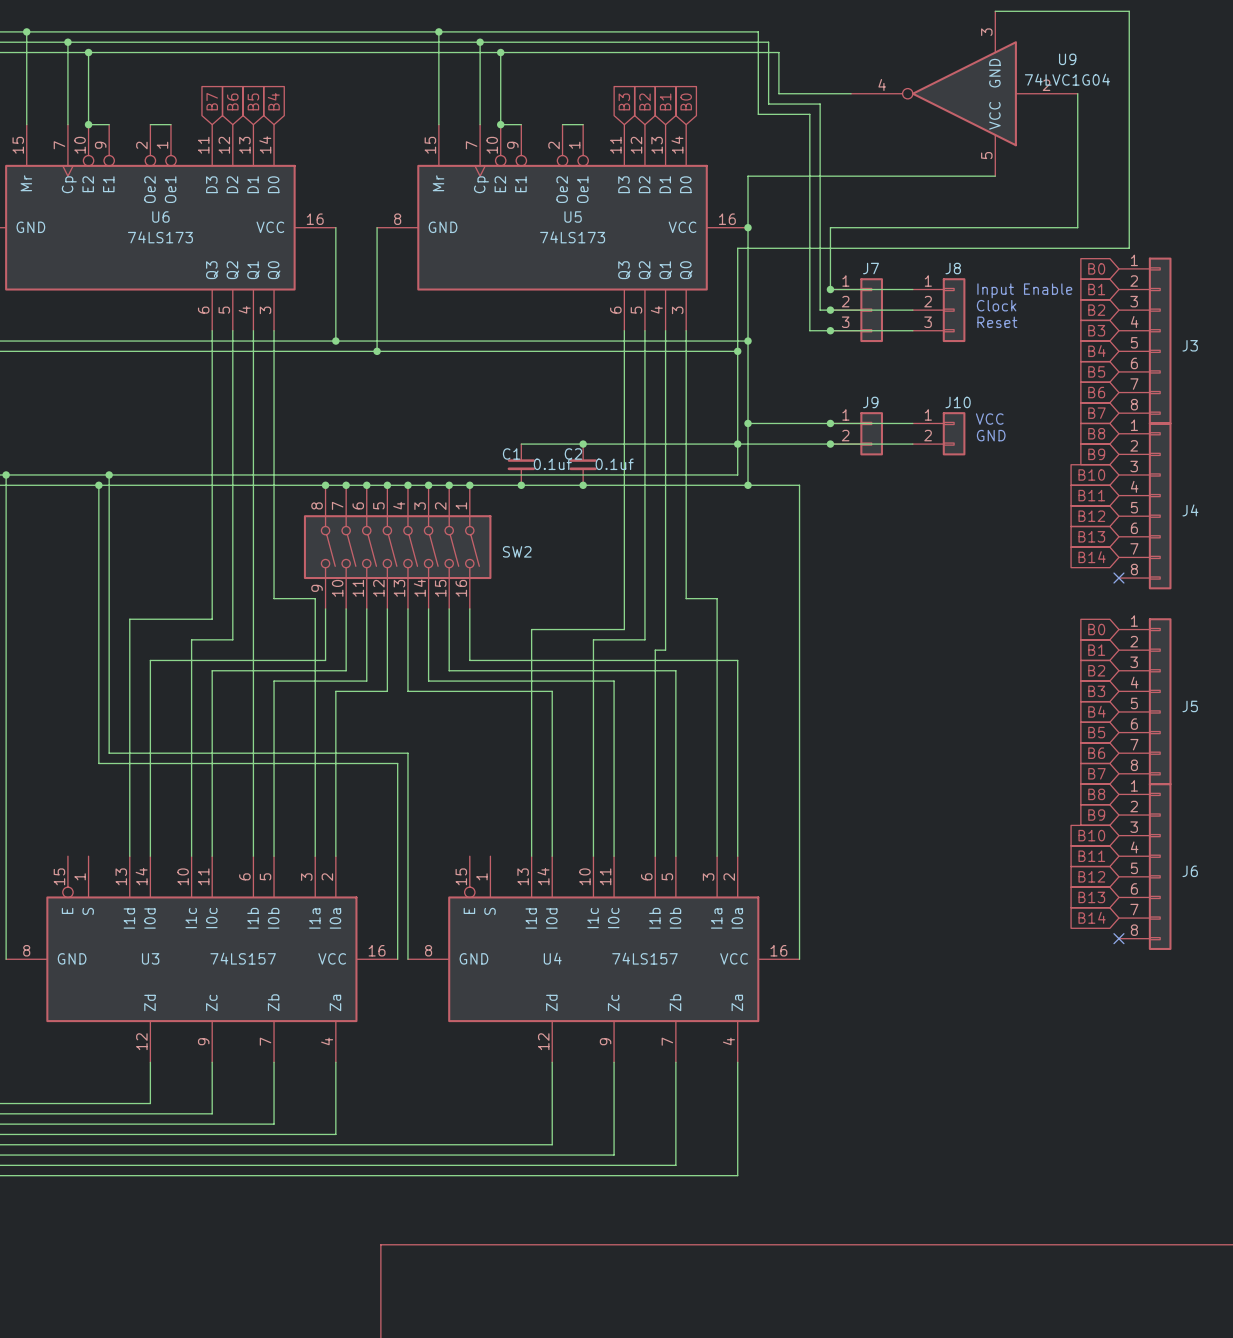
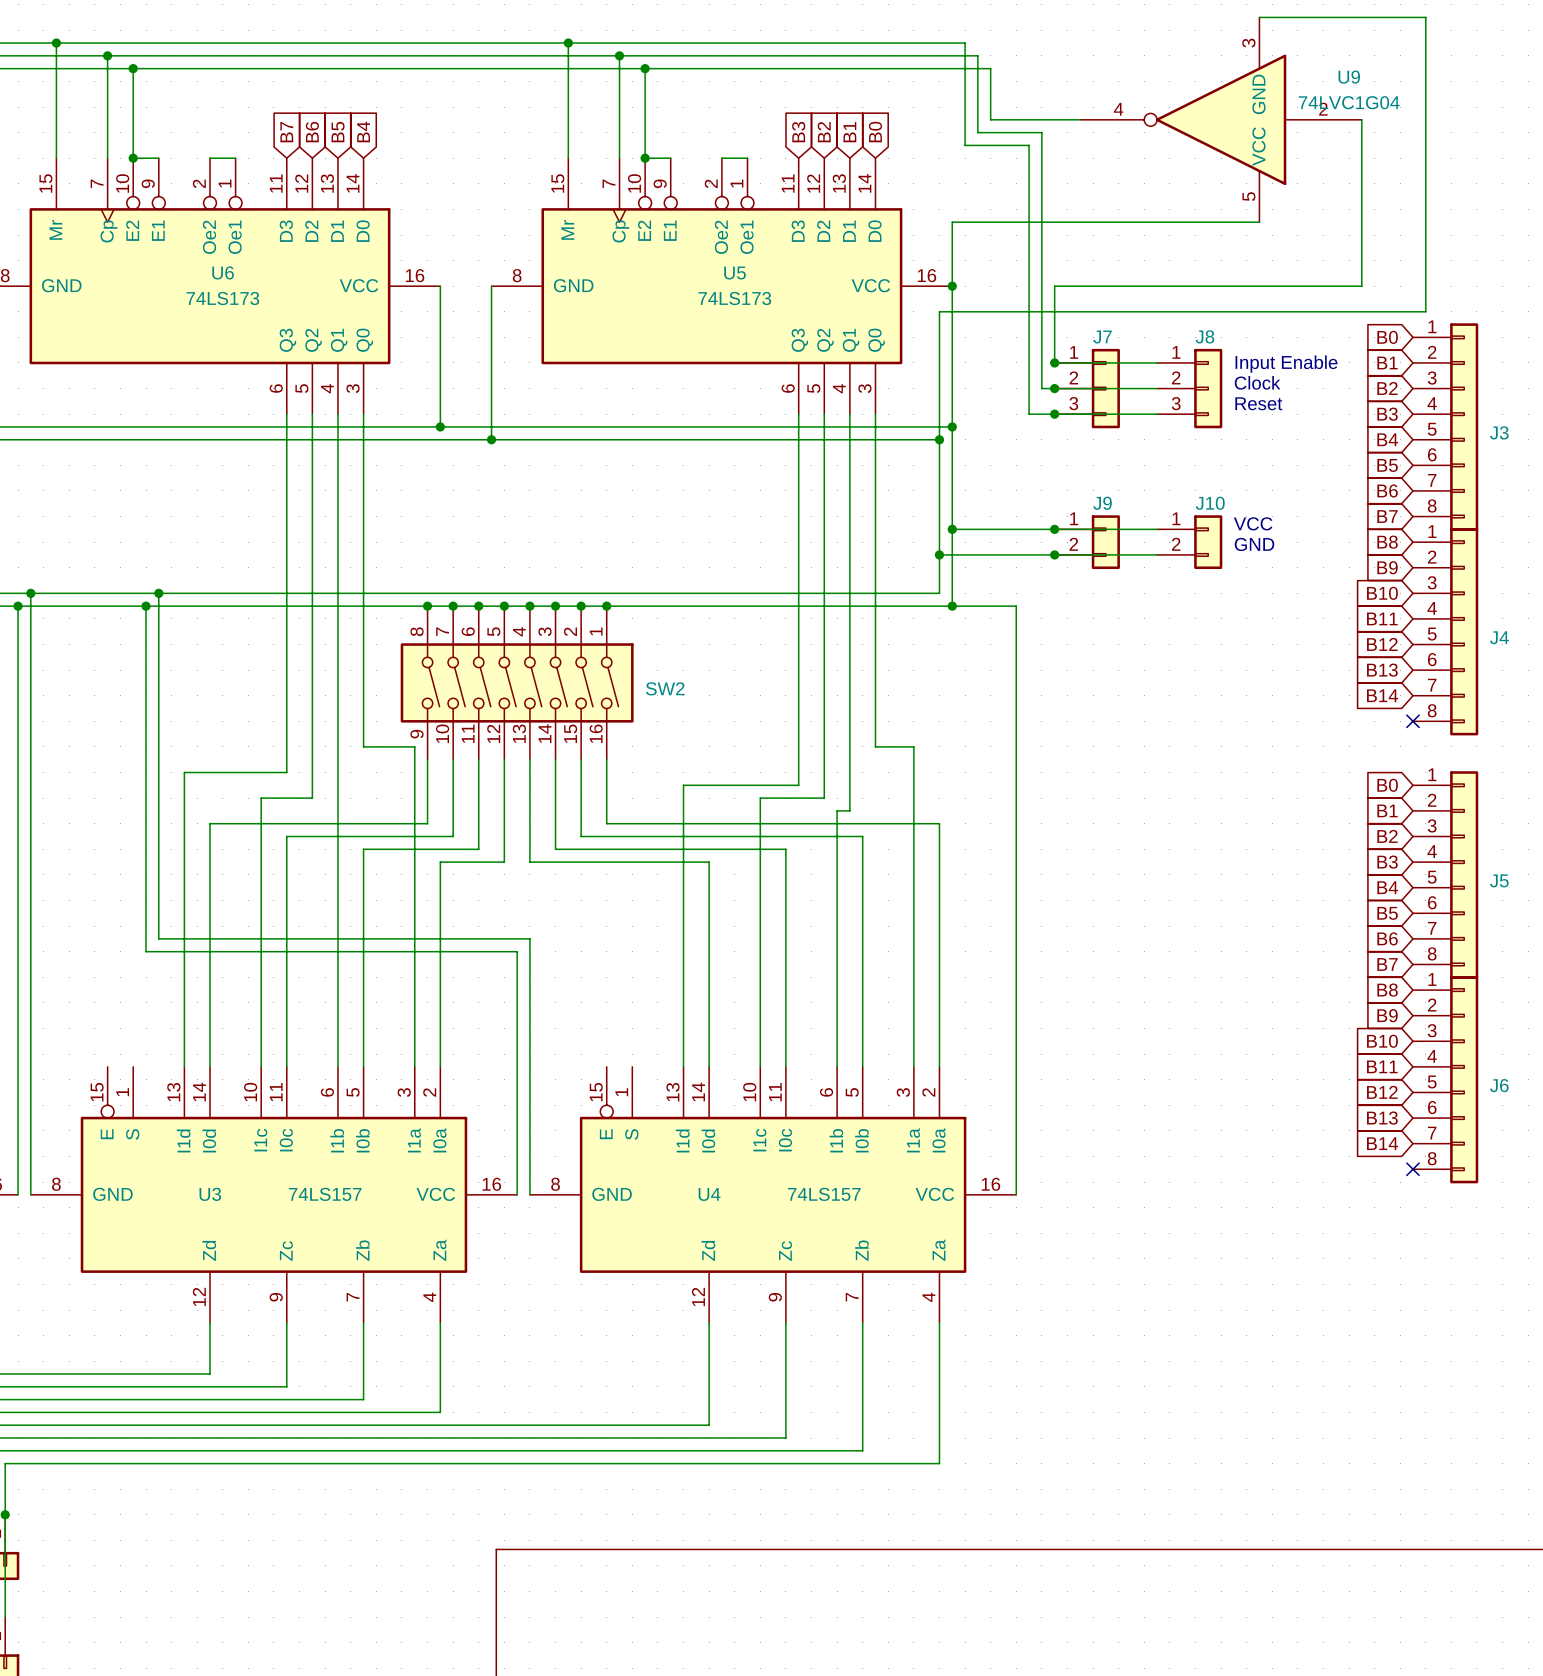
wire: (521, 444) (737, 444) -> none
junction: (583, 444) -> none
C1: 0.1uf (521, 464) -> none
C2: 0.1uf (583, 464) -> none
junction: (521, 485) -> none
junction: (583, 485) -> none

